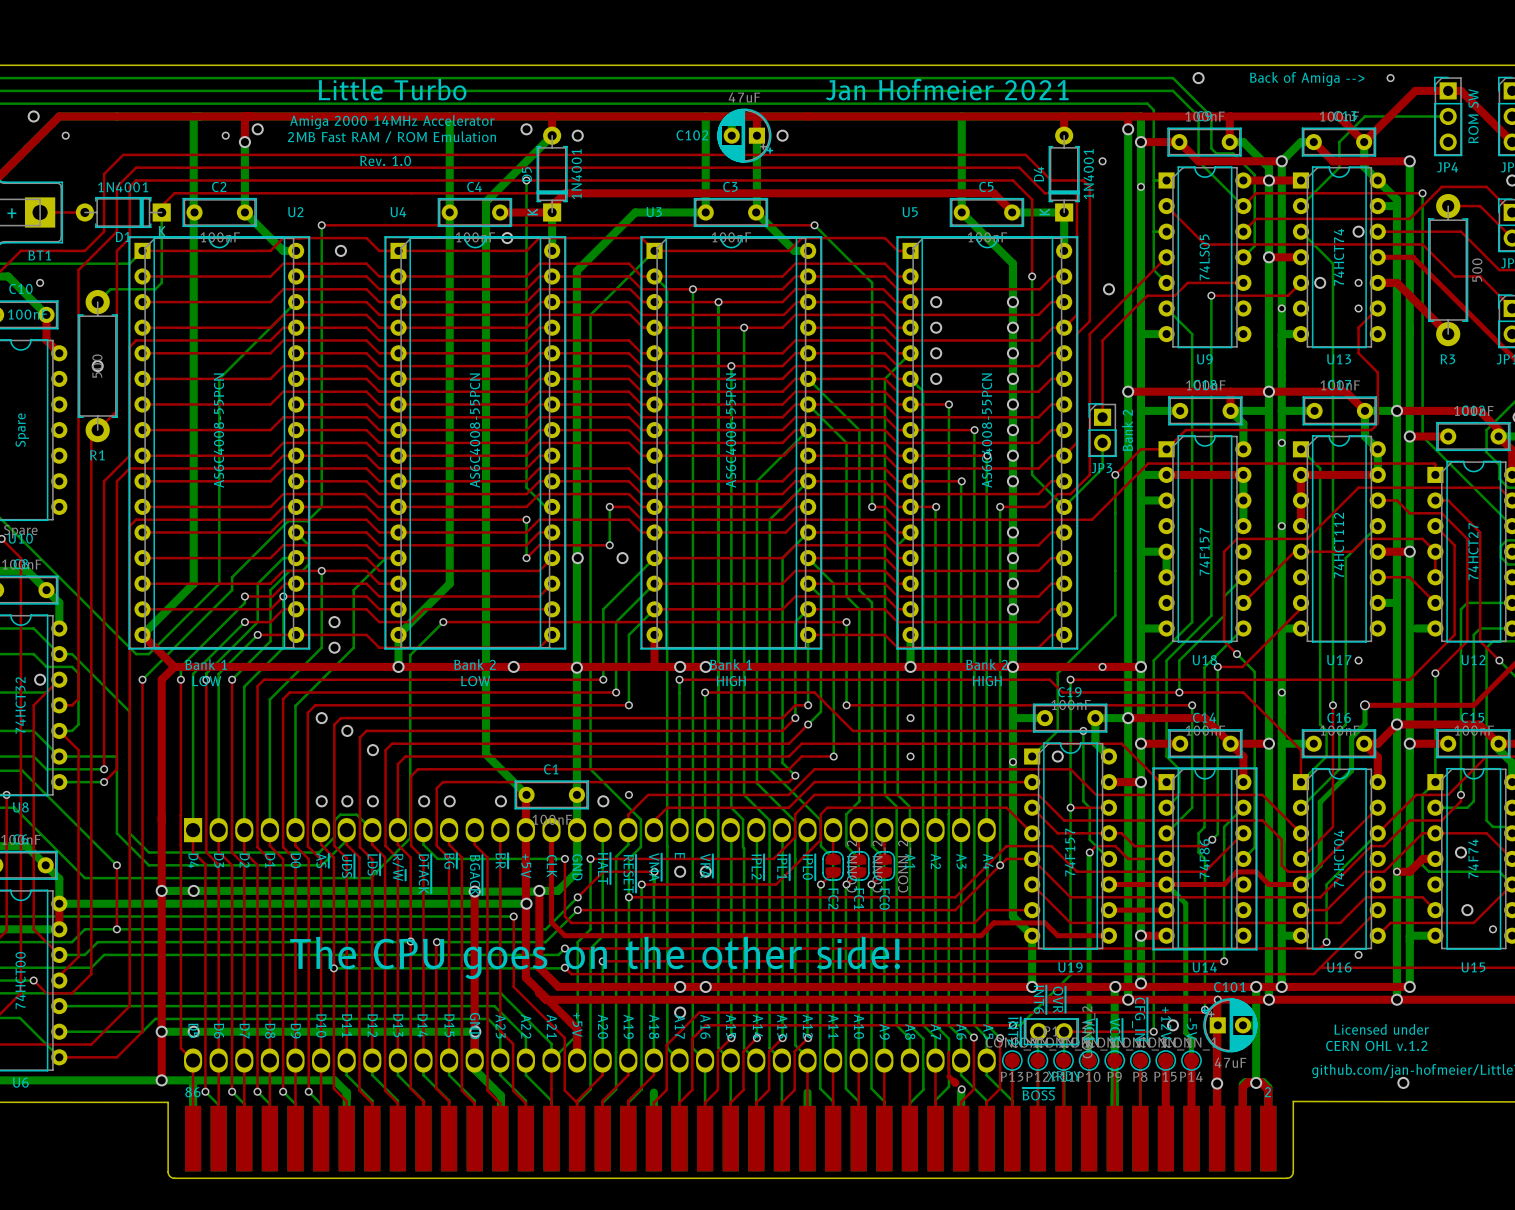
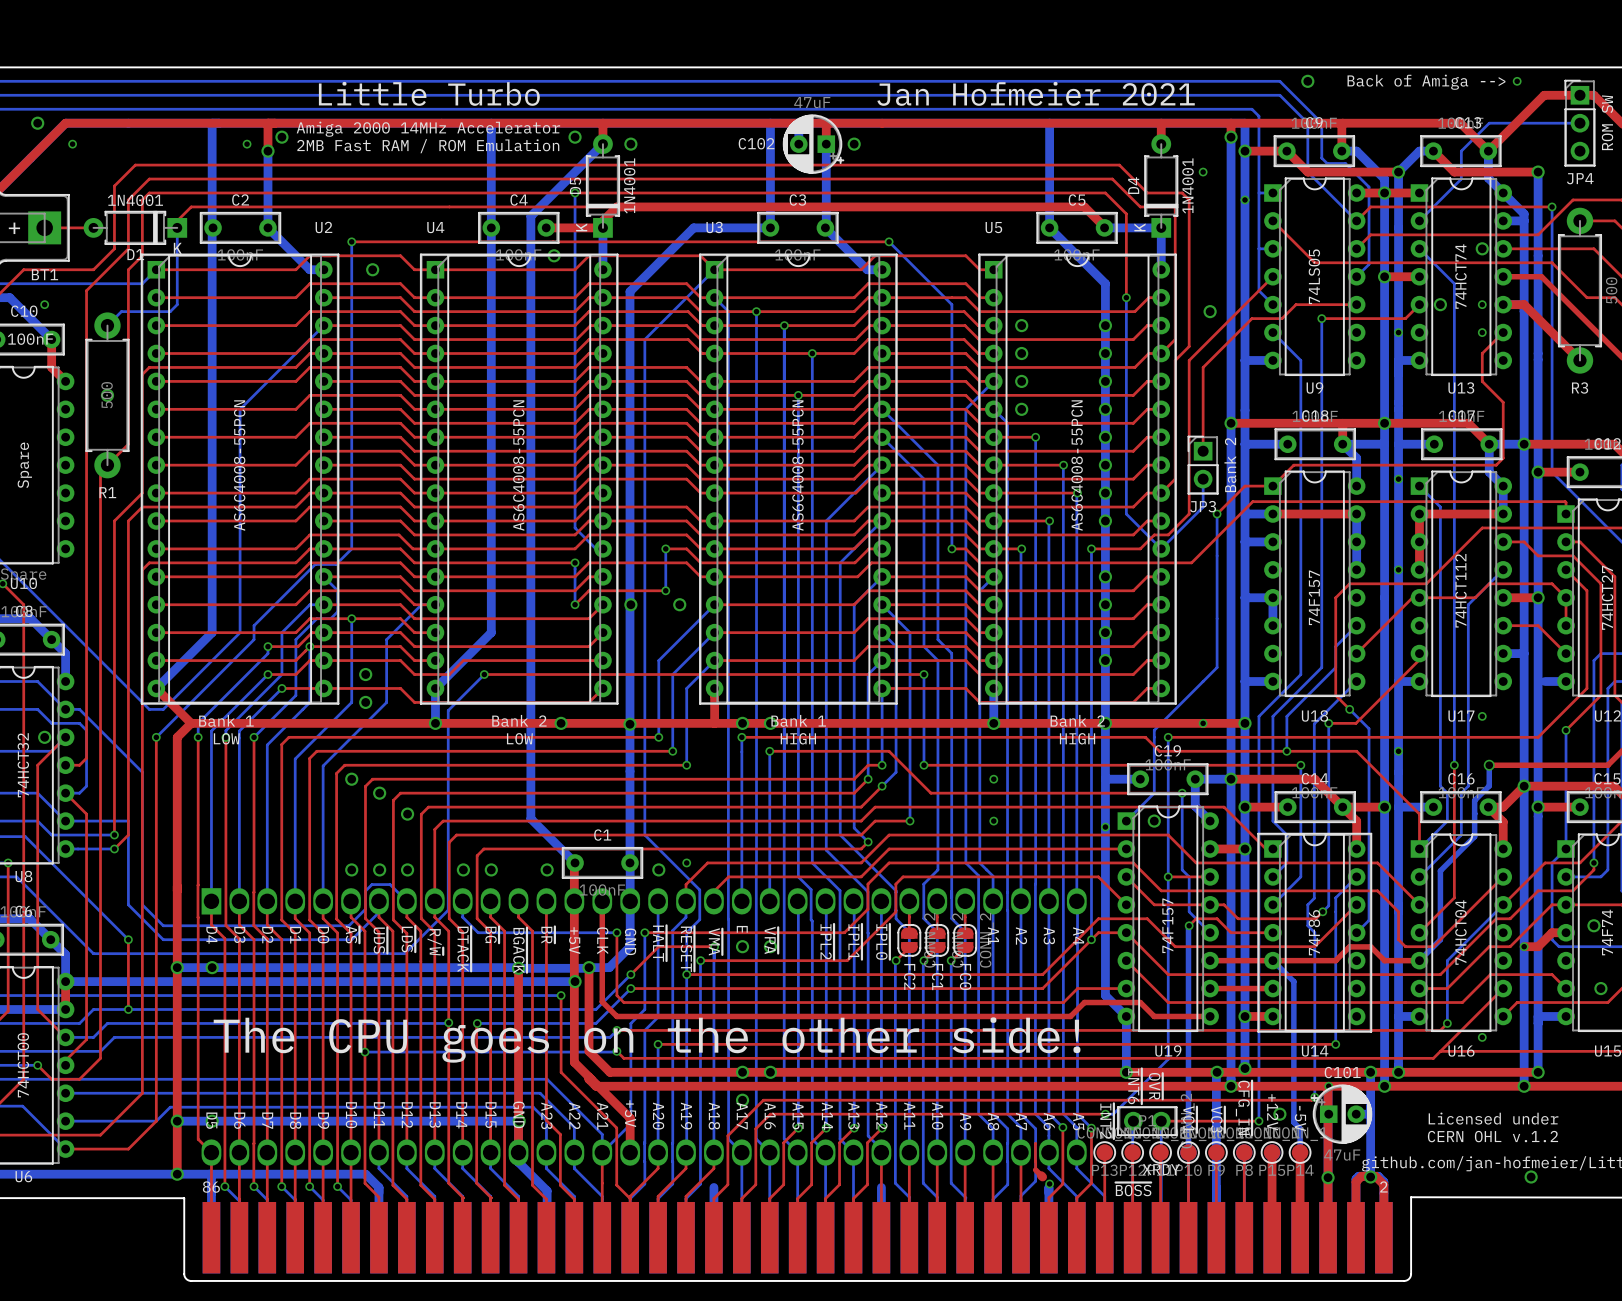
text: Rev. 1.0 (385, 160) -> none

